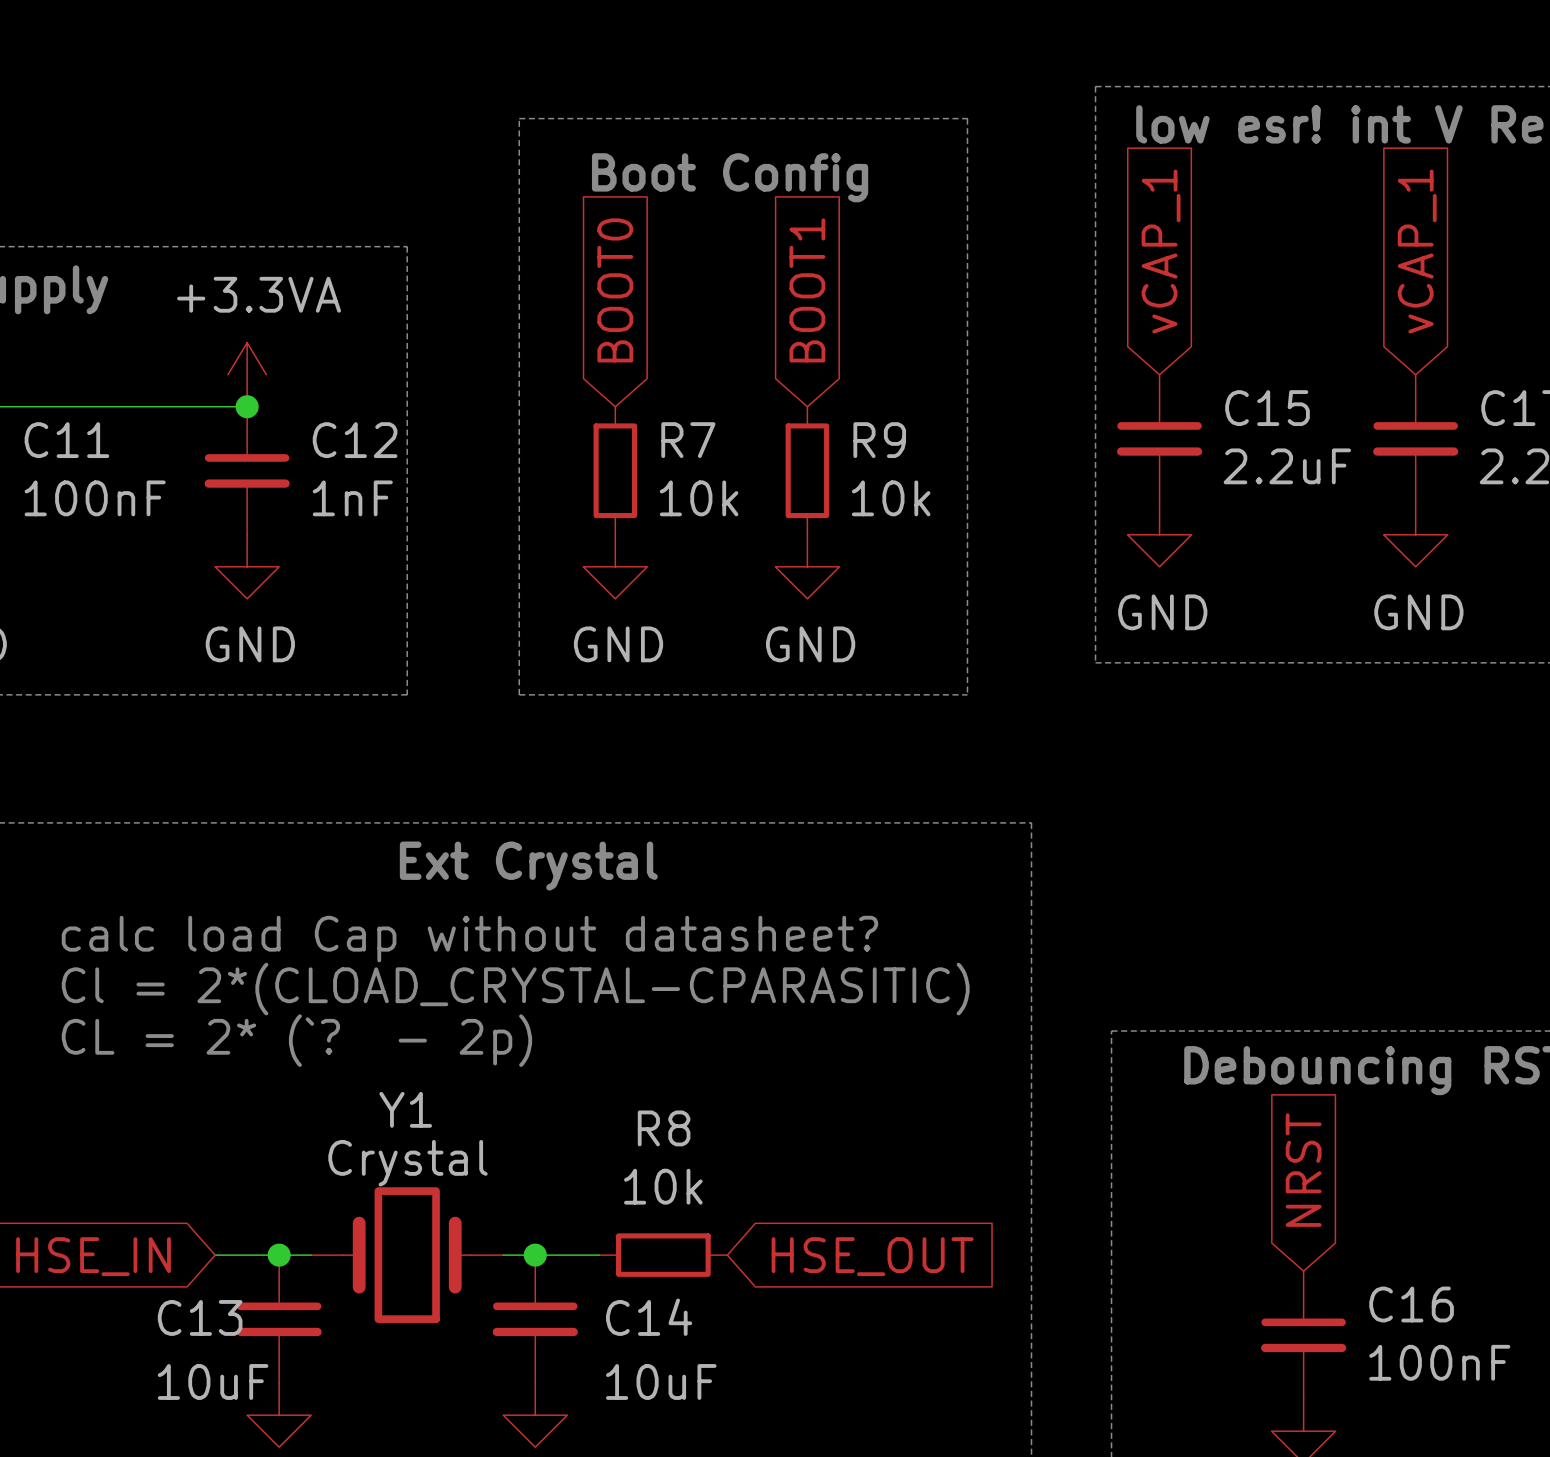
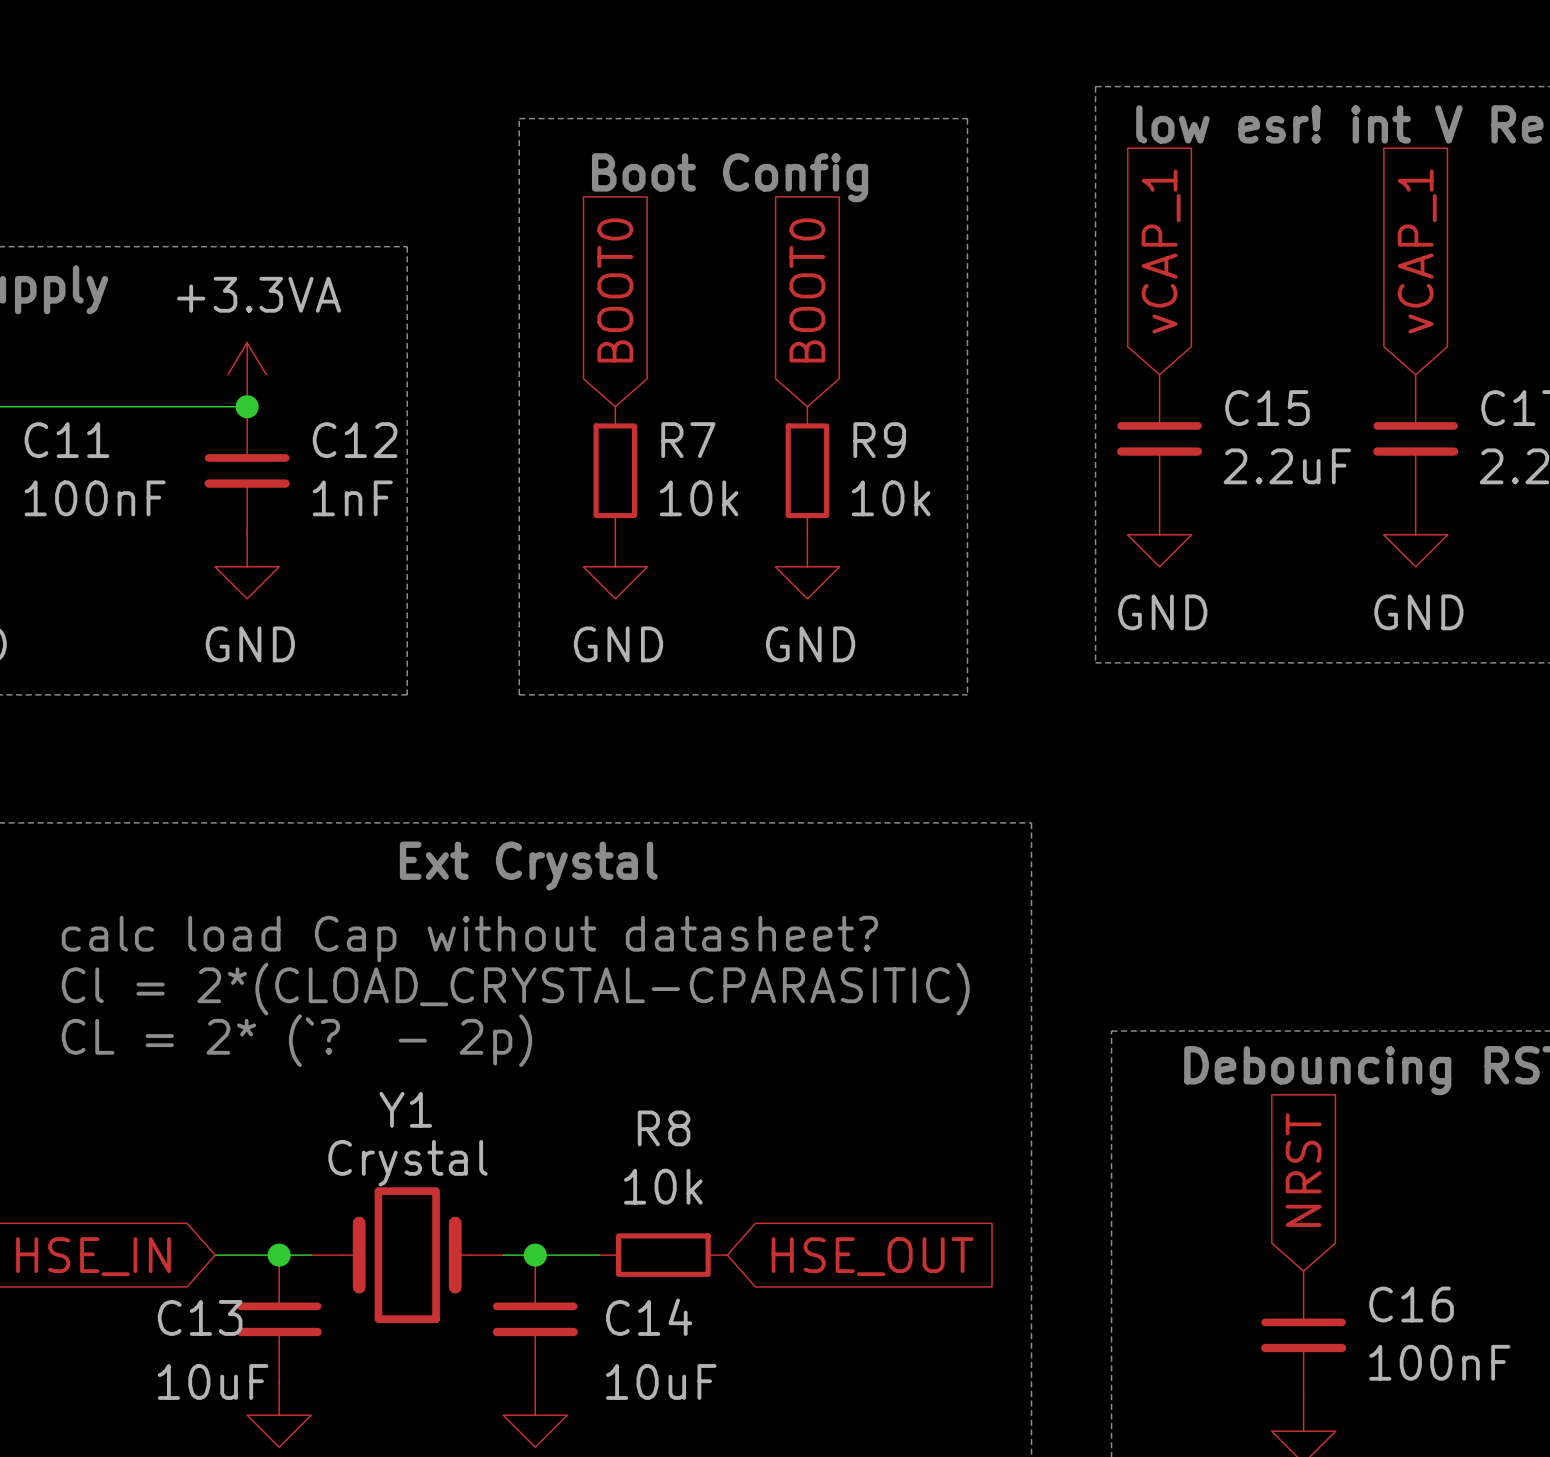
global label: BOOT1 (807, 290) -> BOOT0 (807, 290)

